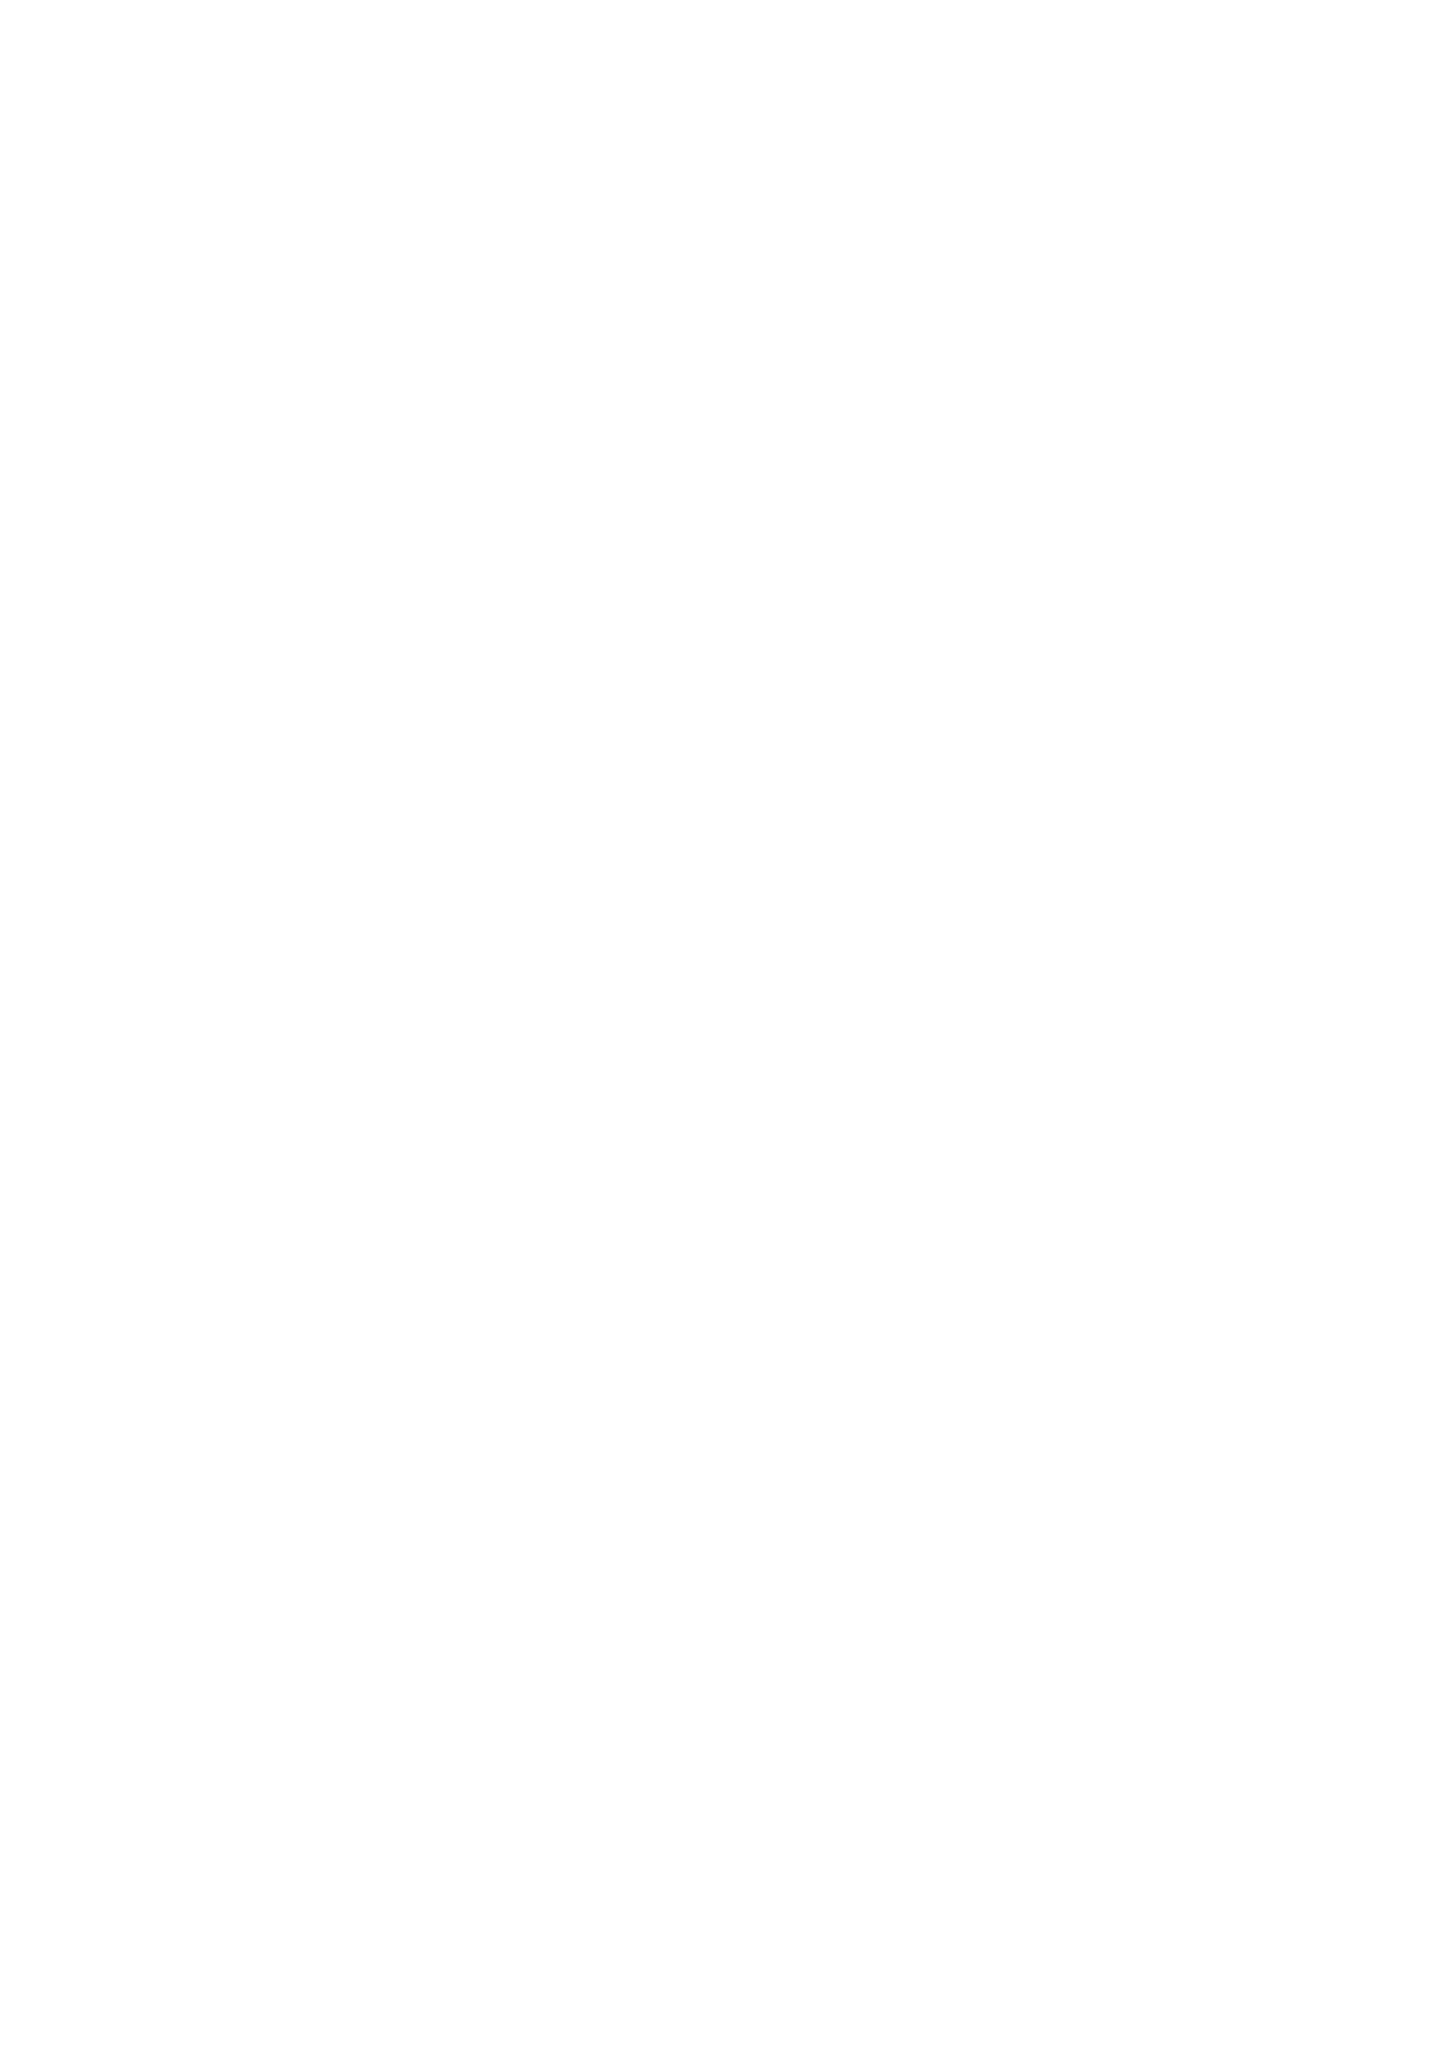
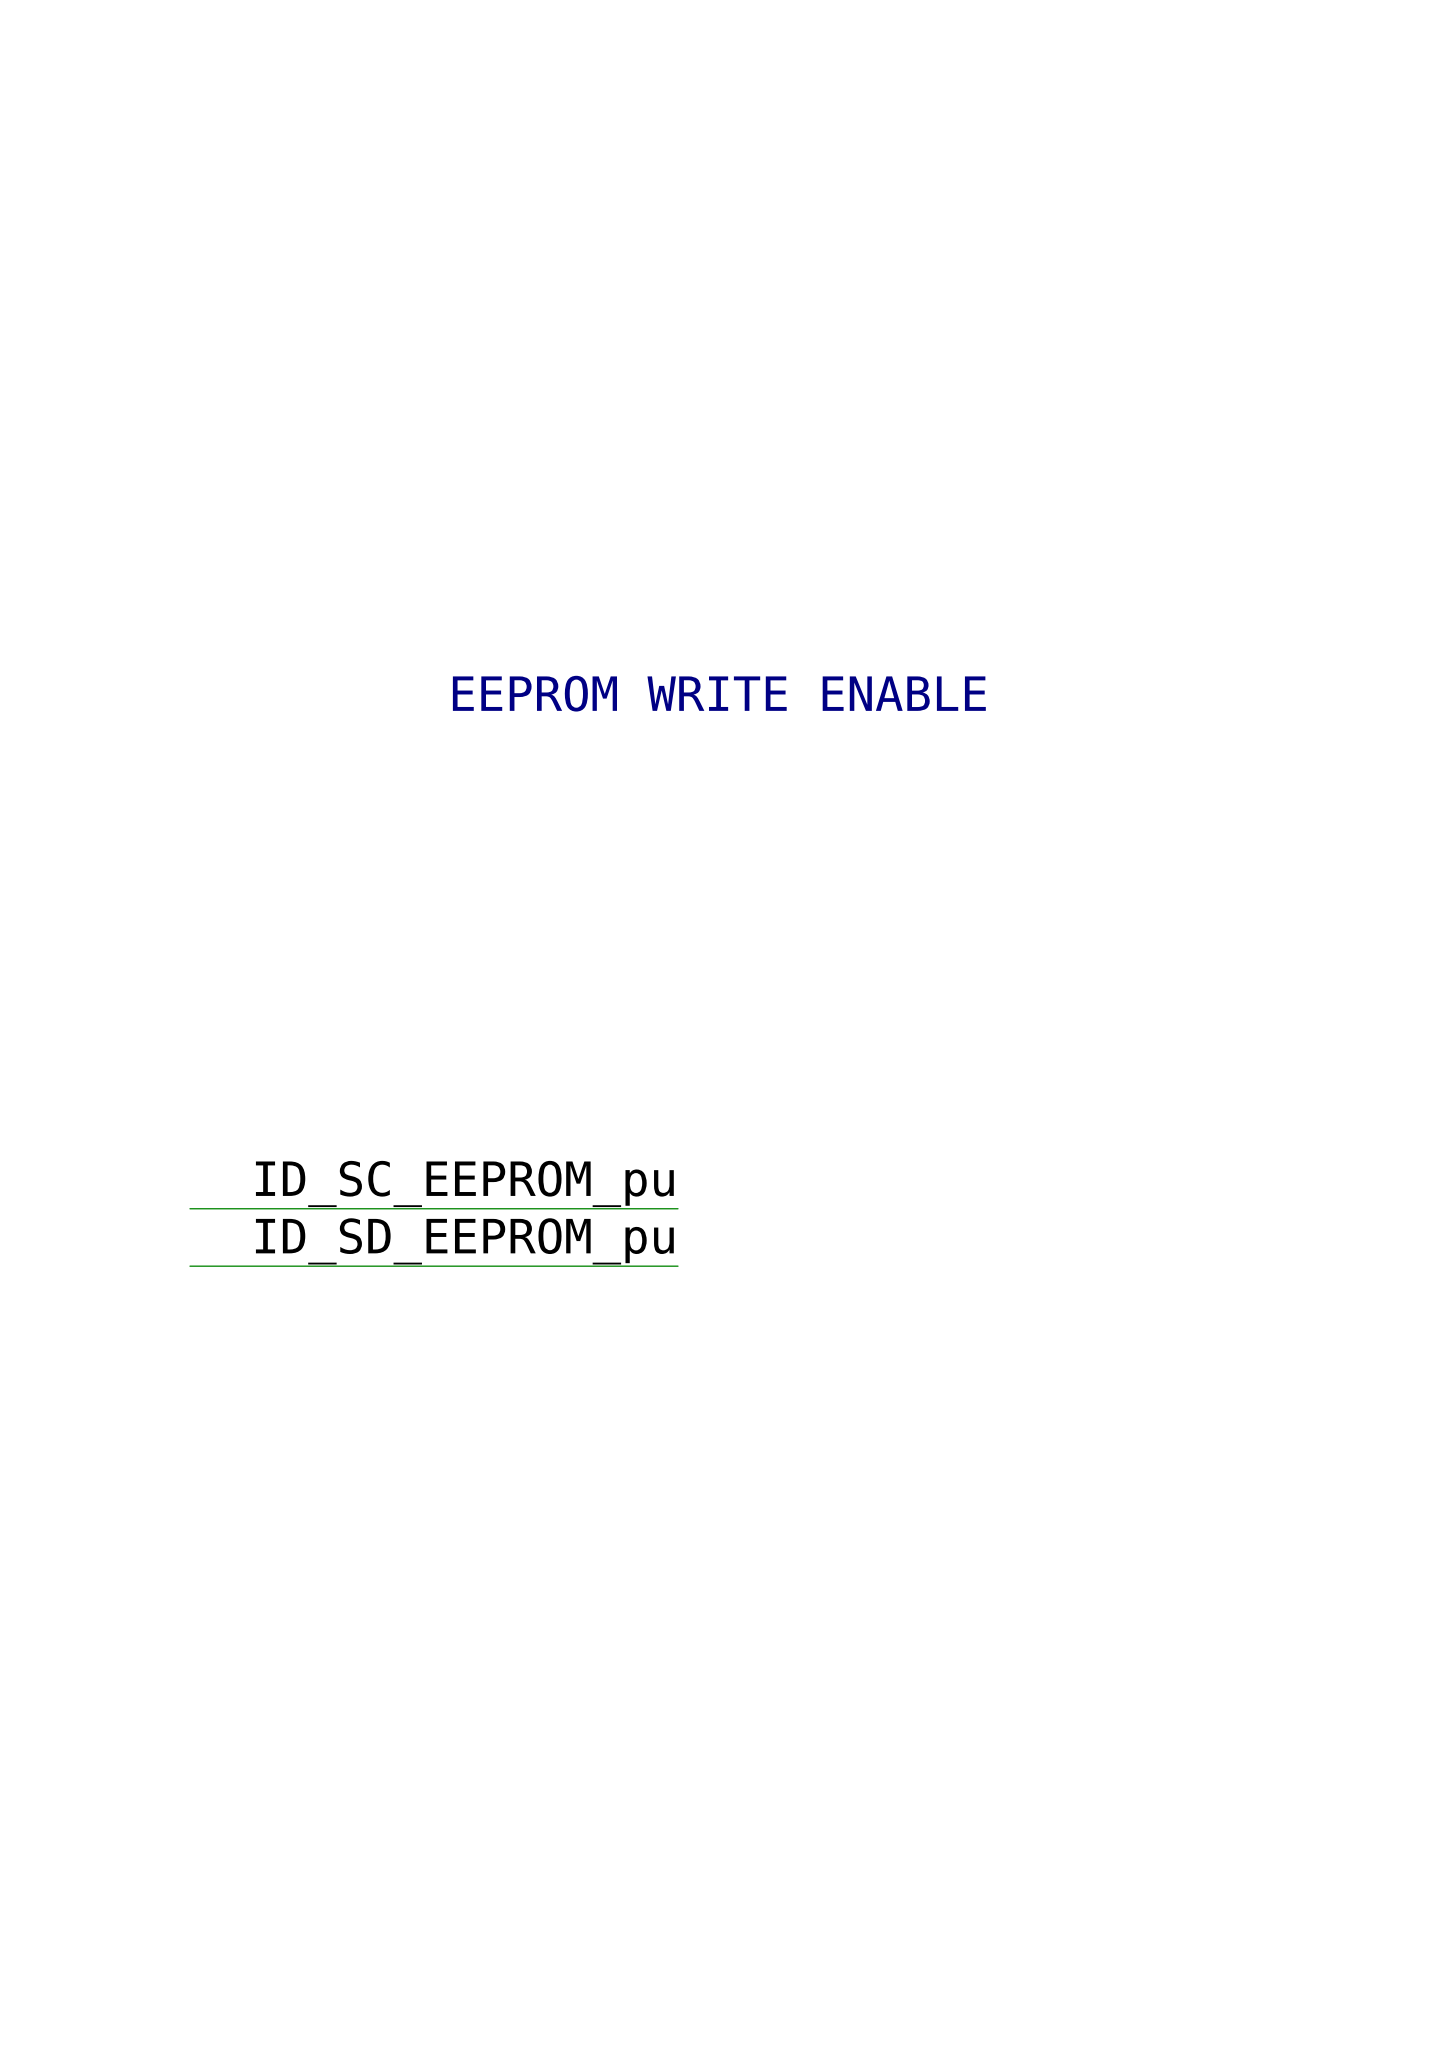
text: none -> EEPROM WRITE ENABLE (719, 693)
label: none -> ID_SC_EEPROM_pu (464, 1183)
wire: none -> (189, 1208) (678, 1208)
label: none -> ID_SD_EEPROM_pu (464, 1241)
wire: none -> (189, 1266) (678, 1266)

